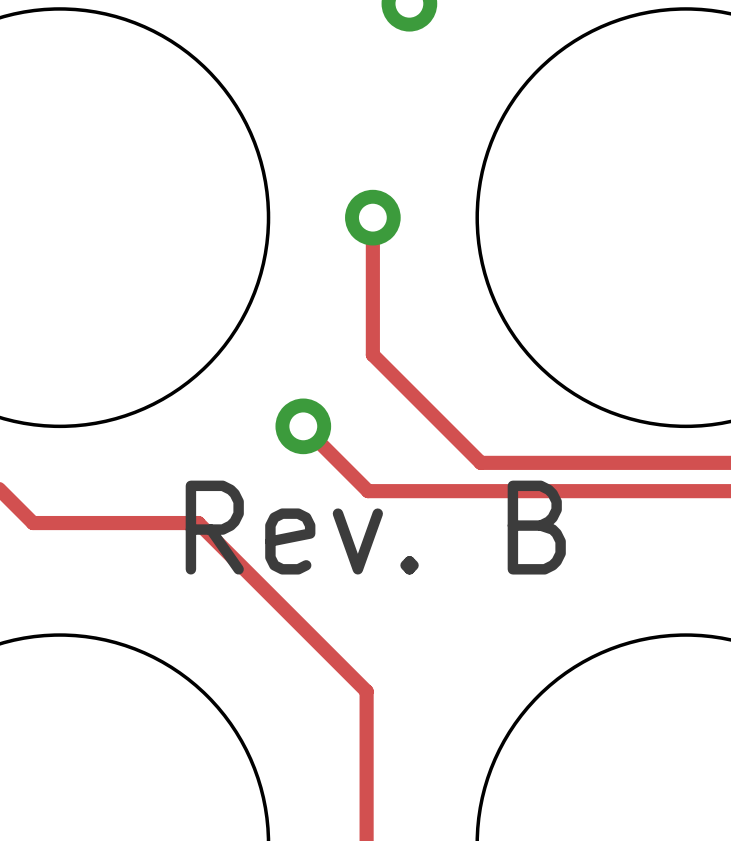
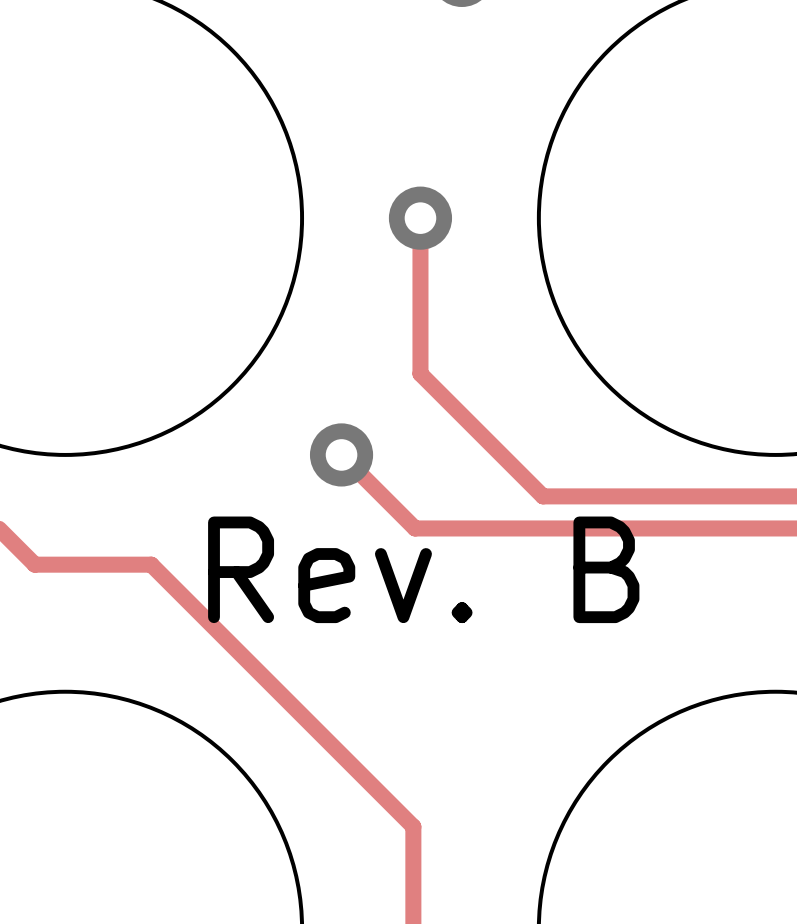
track: (135, 523) (198, 523) (366, 691) (366, 753) -> (151, 564) (413, 826)

